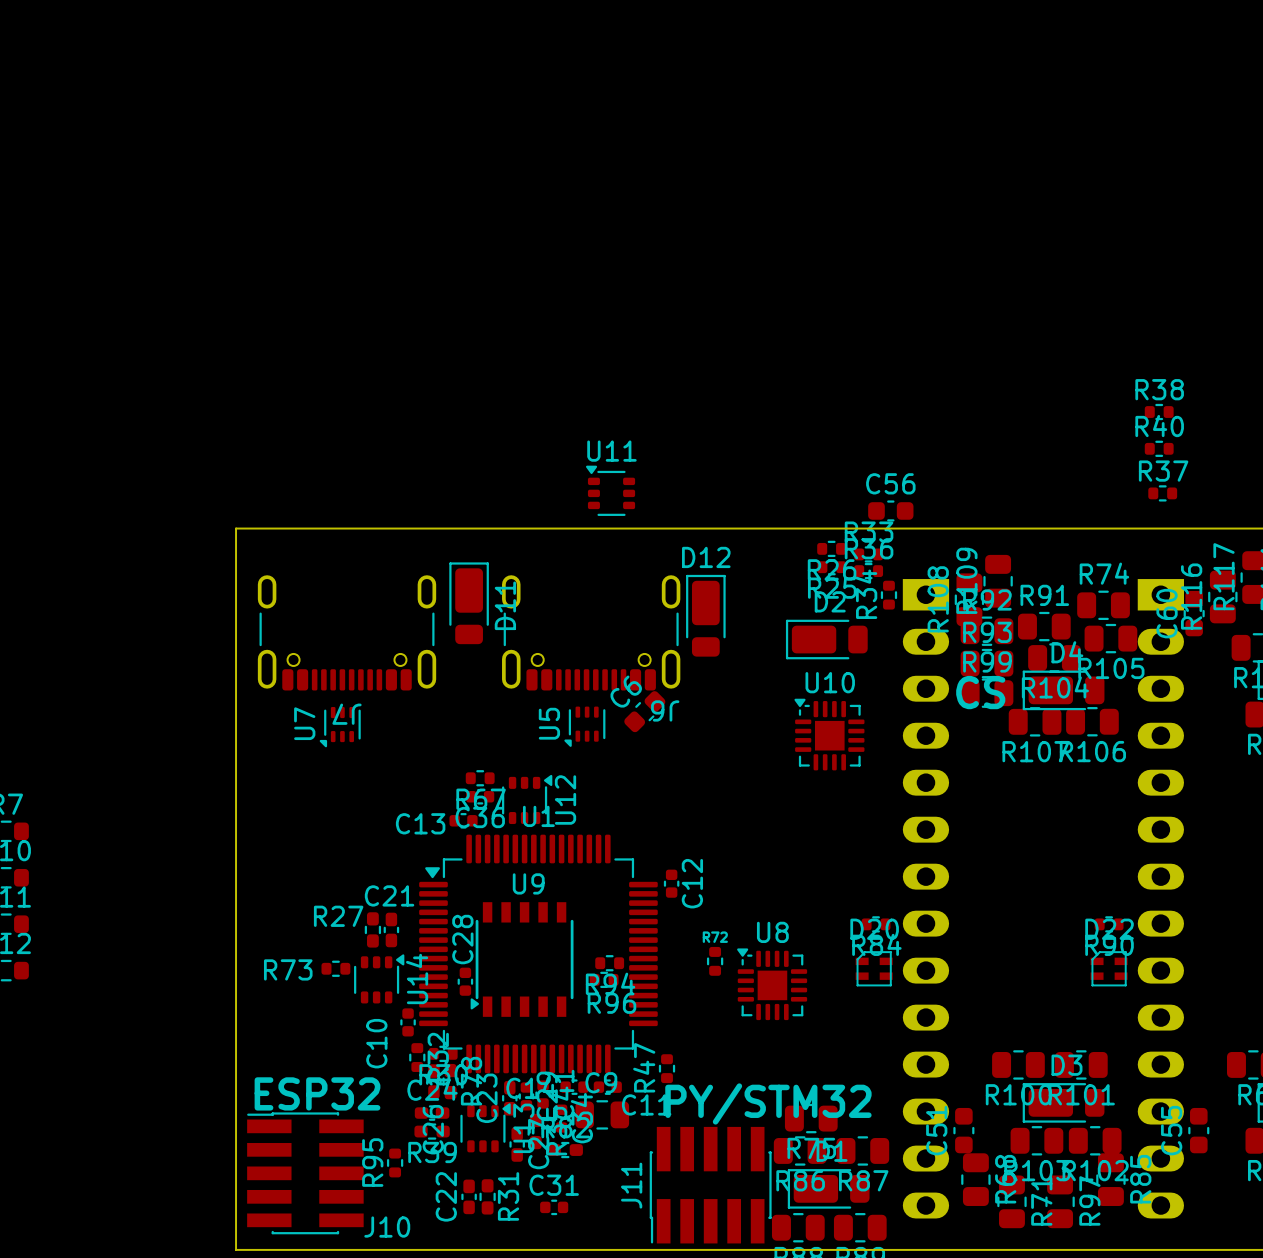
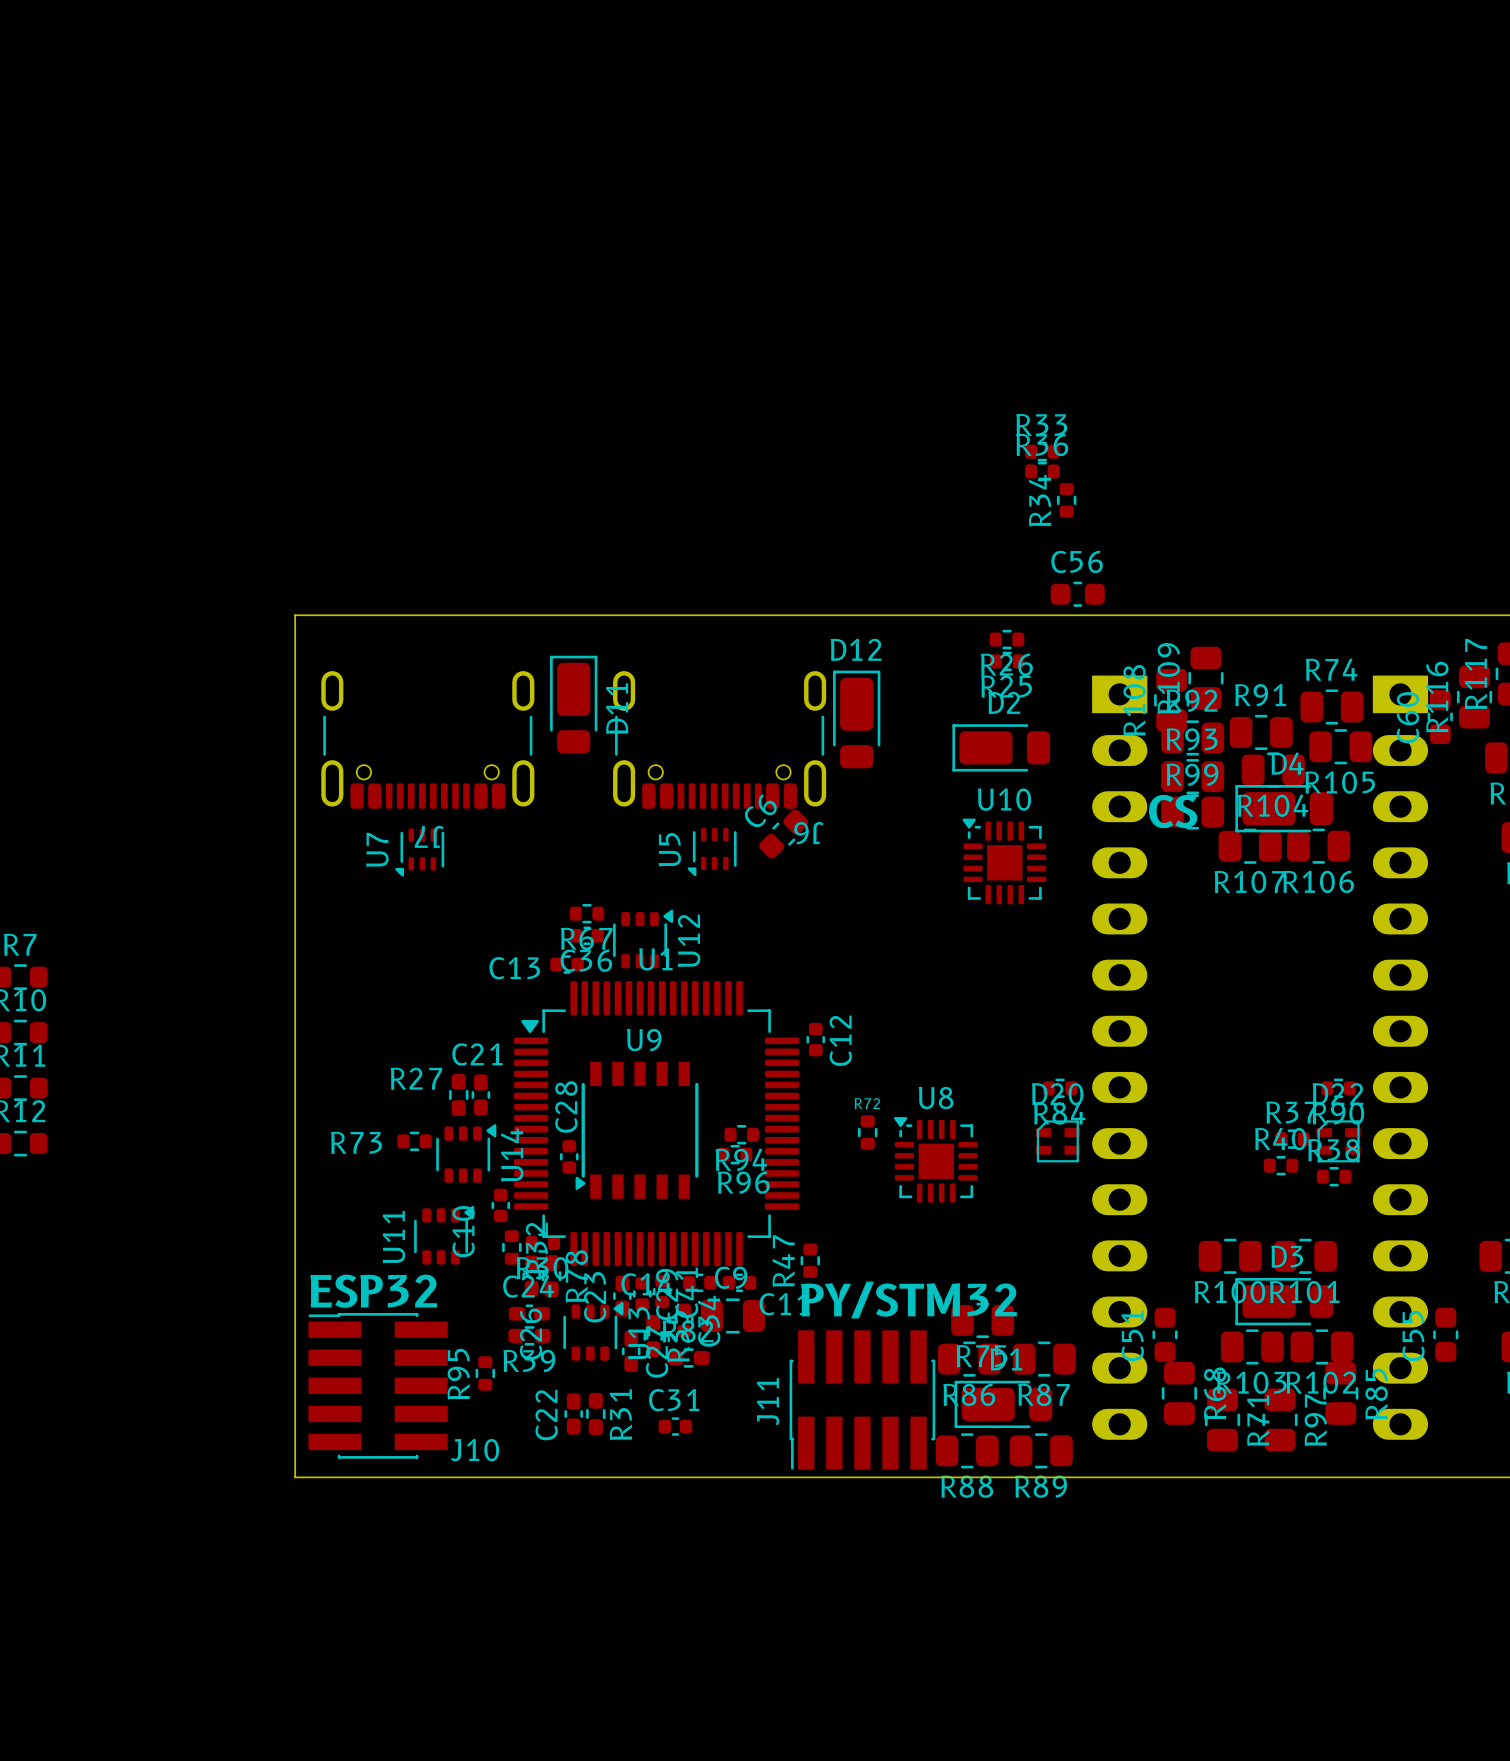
R38 position: (1159, 412) -> (1334, 1176)
R40 position: (1159, 448) -> (1281, 1165)
U11 name position: U11 (611, 451) -> U11 (393, 1237)
U11 rotation: 0° (610, 490) -> 90° clockwise (444, 1235)
U11 position: (610, 490) -> (444, 1235)
R37 position: (1162, 493) -> (1292, 1139)
R33 position: (868, 554) -> (1042, 451)
R36 position: (868, 571) -> (1042, 471)
R34 position: (888, 595) -> (1066, 500)

